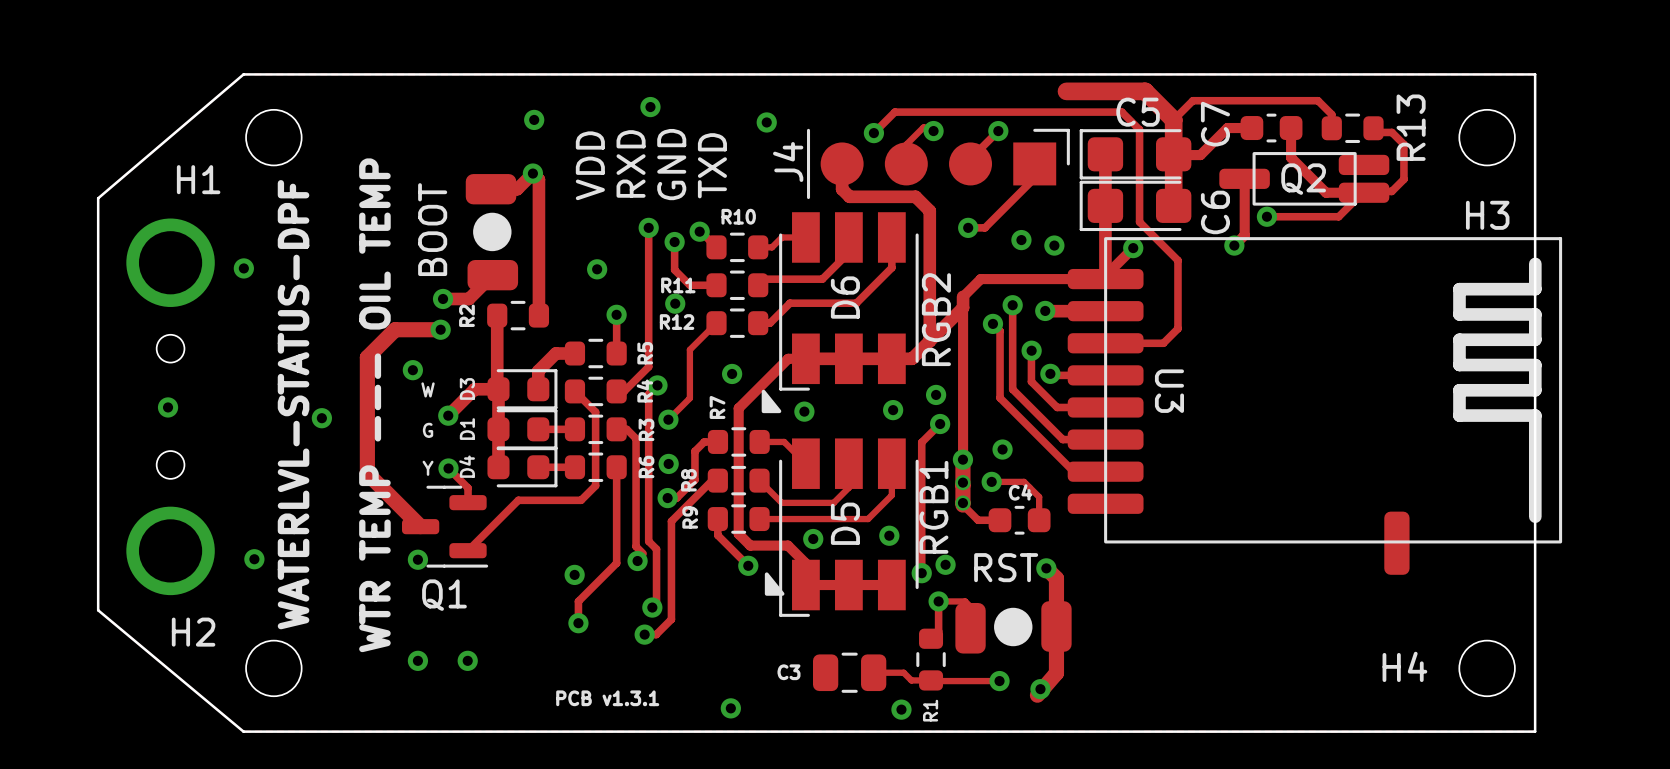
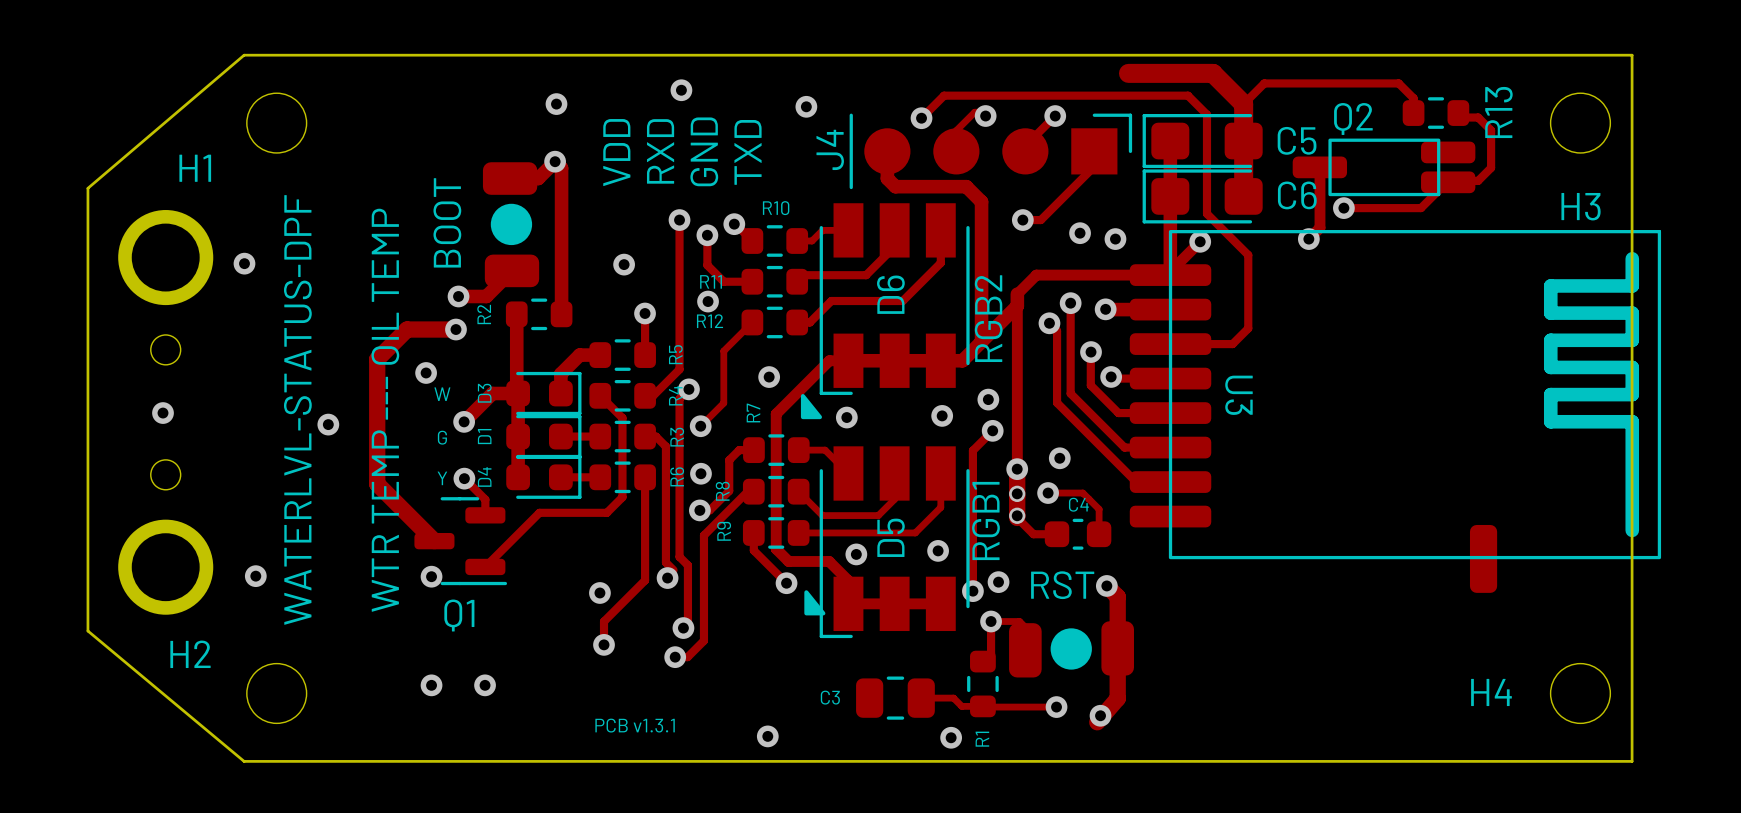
C5 name position: C5 (1138, 112) -> C5 (1297, 140)
track: (1251, 128) (1227, 128) (1200, 155) (1173, 154) -> none
C7: (1271, 128) -> none
track: (1291, 128) (1291, 157) (1326, 192) (1364, 192) -> none
Q2 name position: Q2 (1303, 179) -> Q2 (1353, 118)
C6 name rotation: 0° (1215, 212) -> 90° clockwise (1297, 195)

